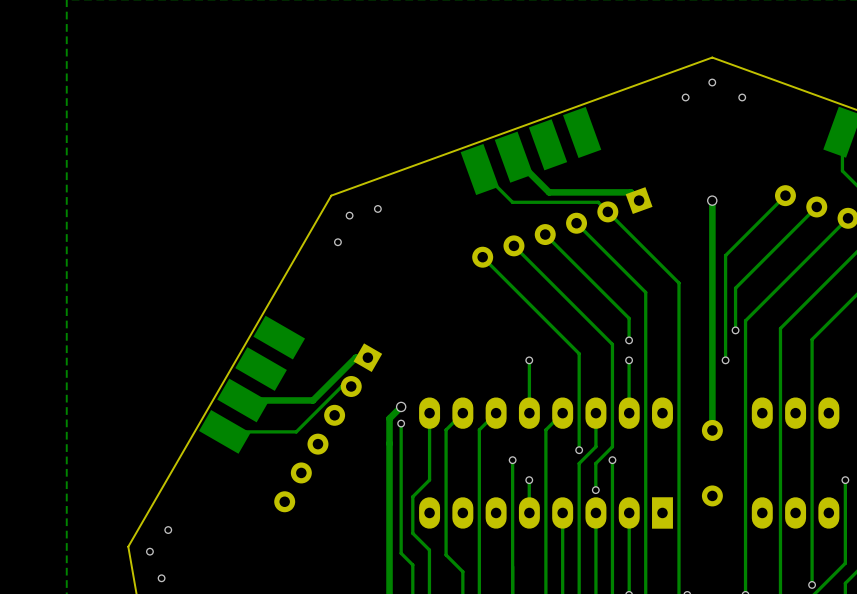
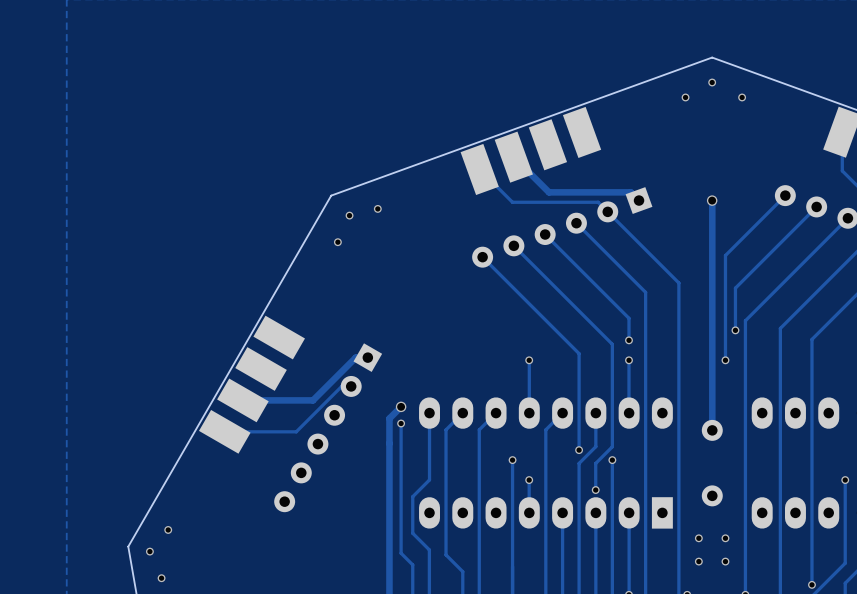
via: none -> (698, 538)
via: none -> (725, 538)
via: none -> (698, 561)
via: none -> (725, 561)

